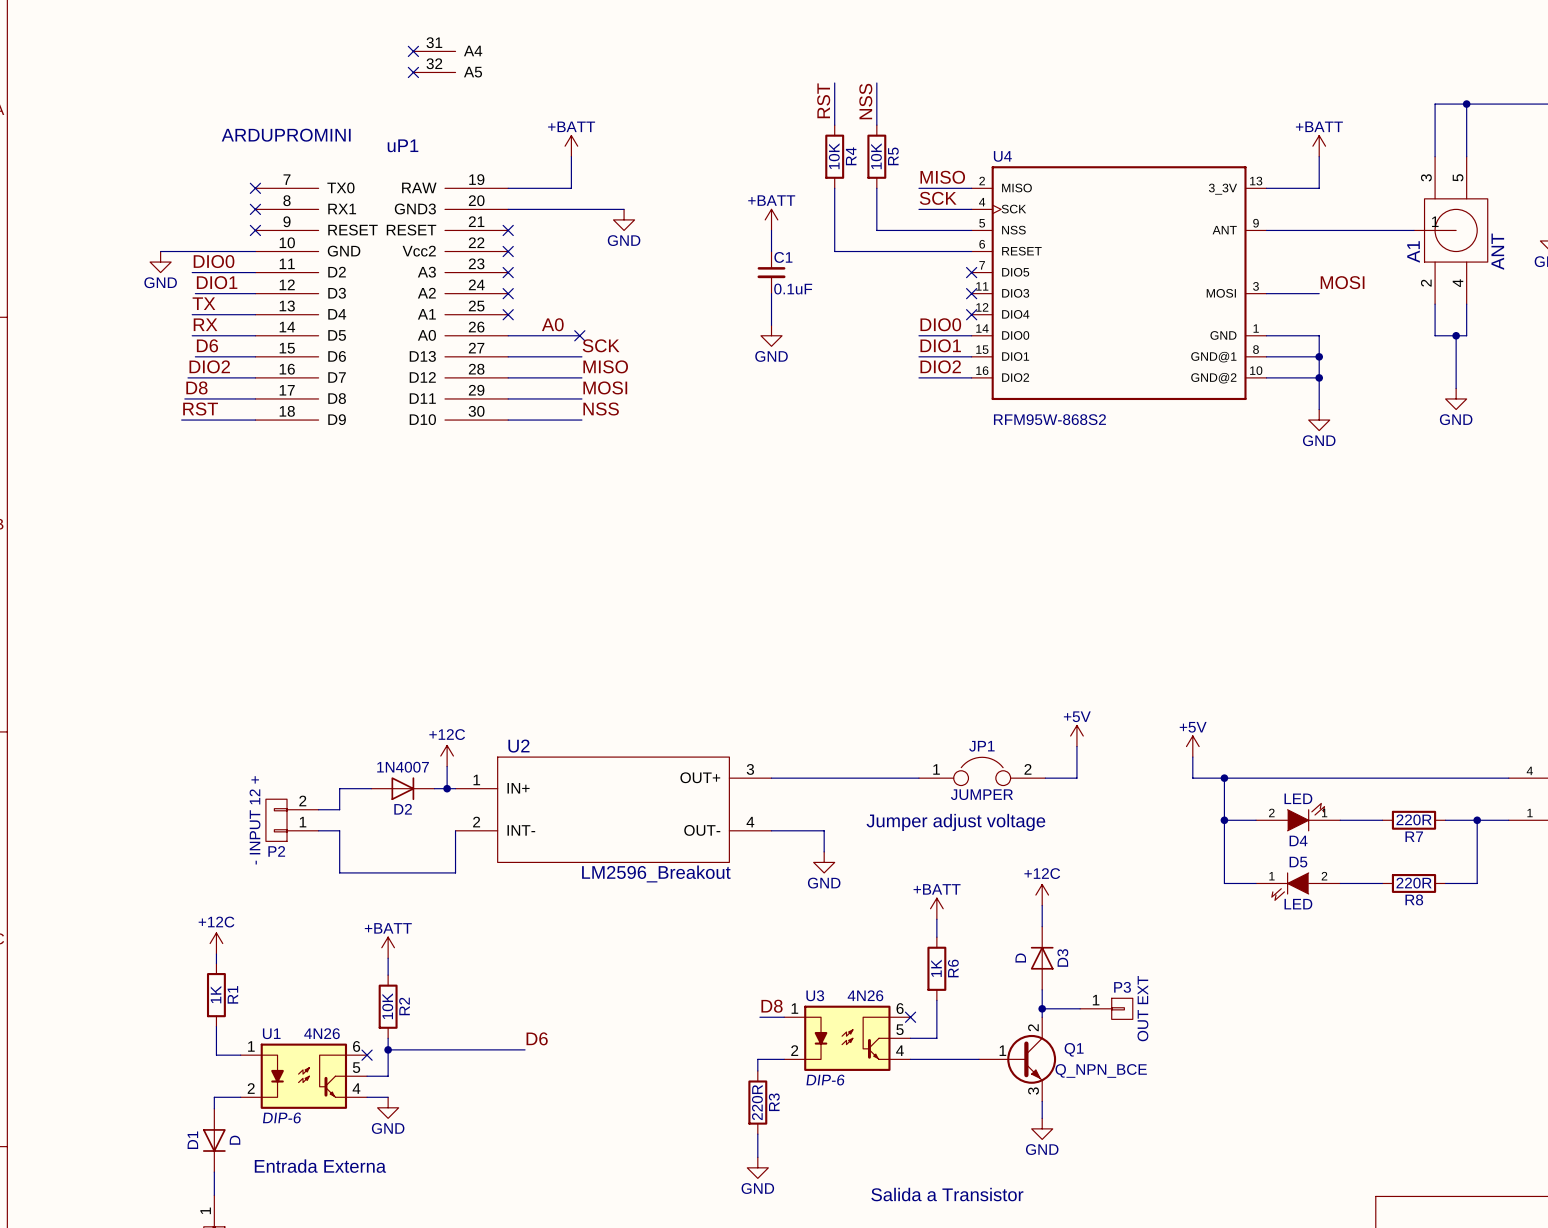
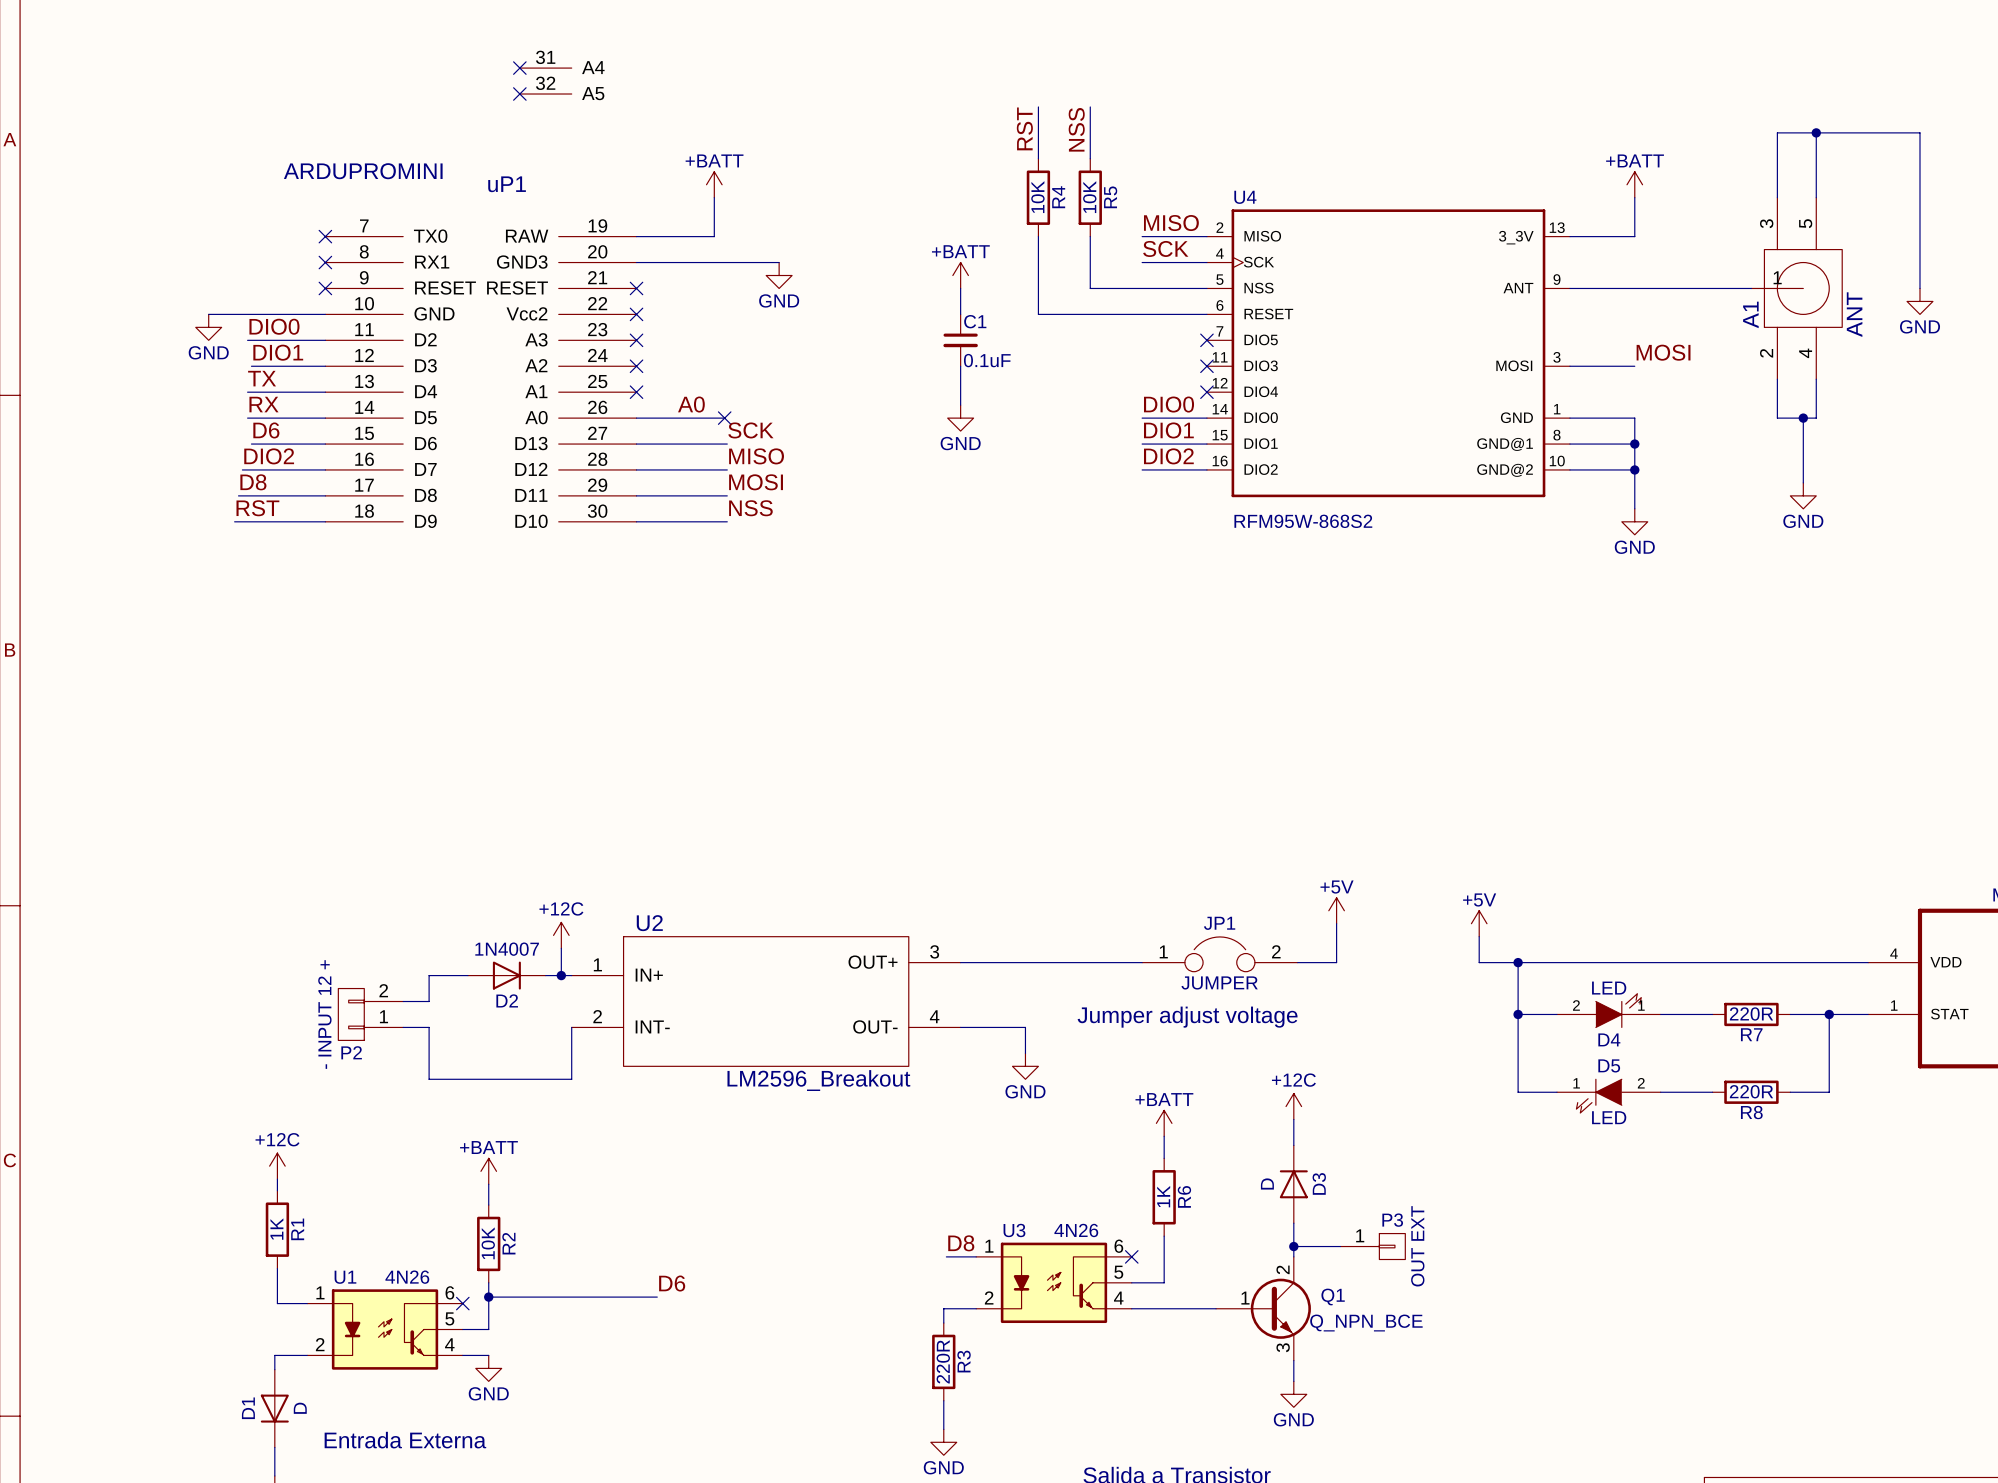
U3 text: DIP-6 (825, 1080) -> none
U1 text: DIP-6 (281, 1117) -> none

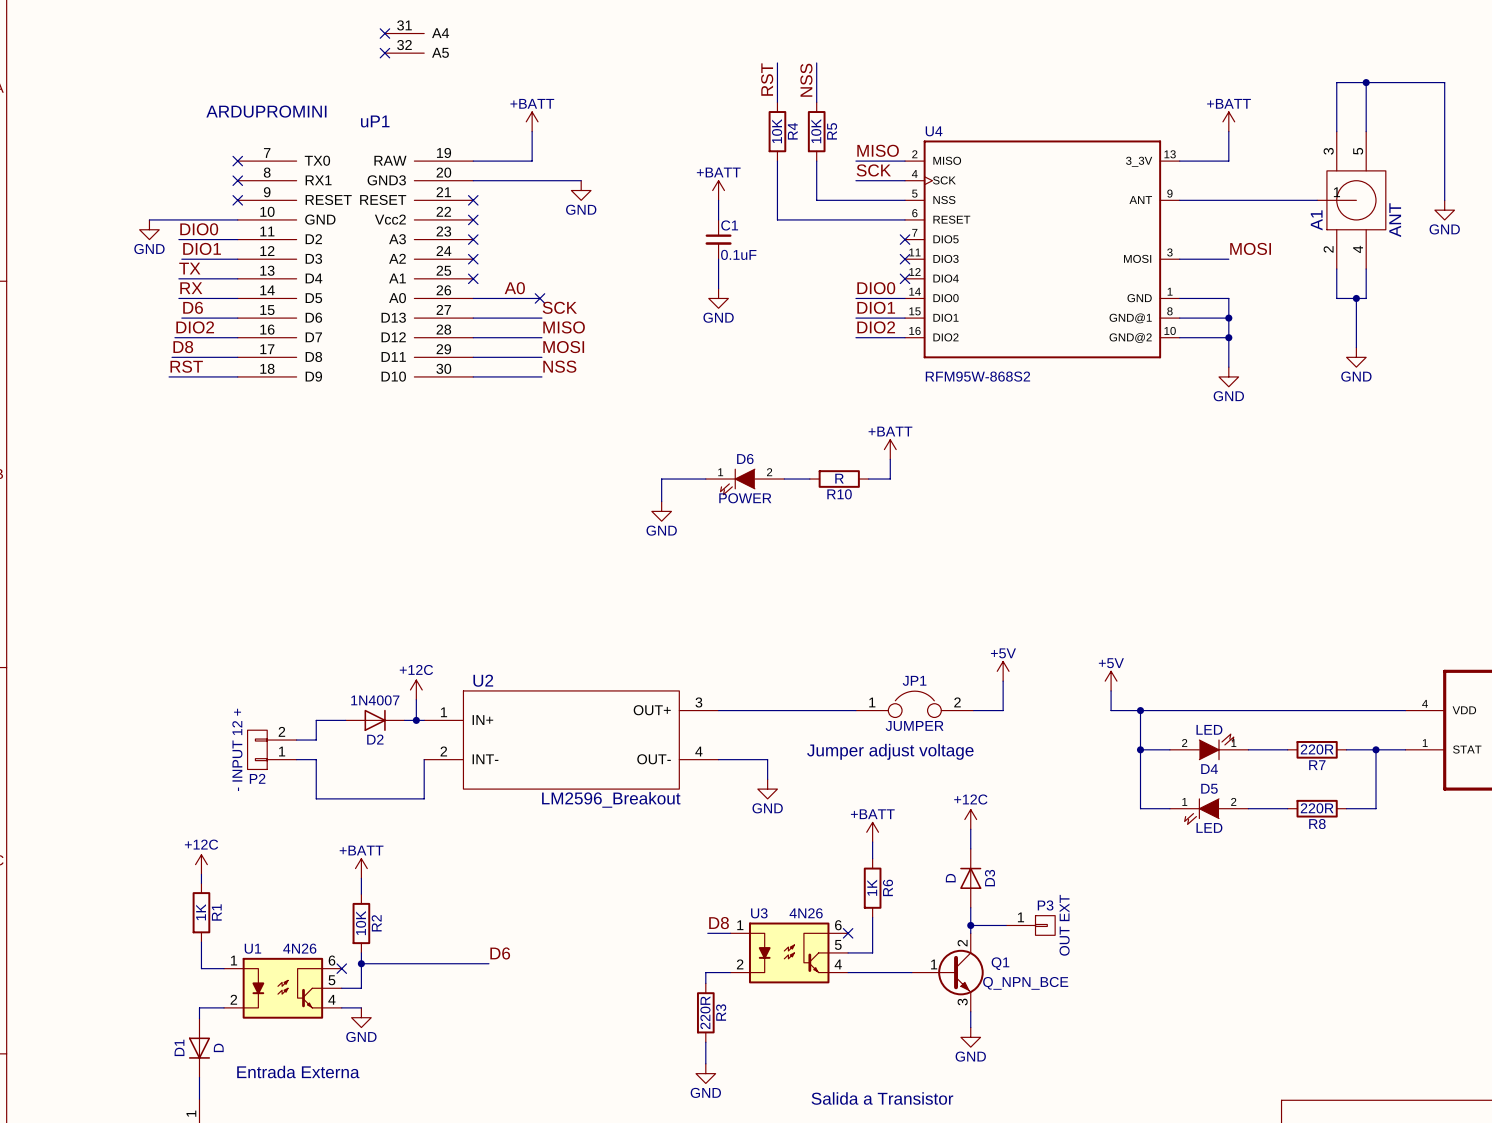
power symbol: none -> +BATT (890, 449)
wire: none -> (890, 459) (890, 479) (868, 479)
wire: none -> (705, 479) (661, 479) (661, 501)
wire: none -> (784, 479) (809, 479)
R10: none -> R (839, 479)
D6: none -> POWER (745, 481)
power symbol: none -> GND (661, 511)

